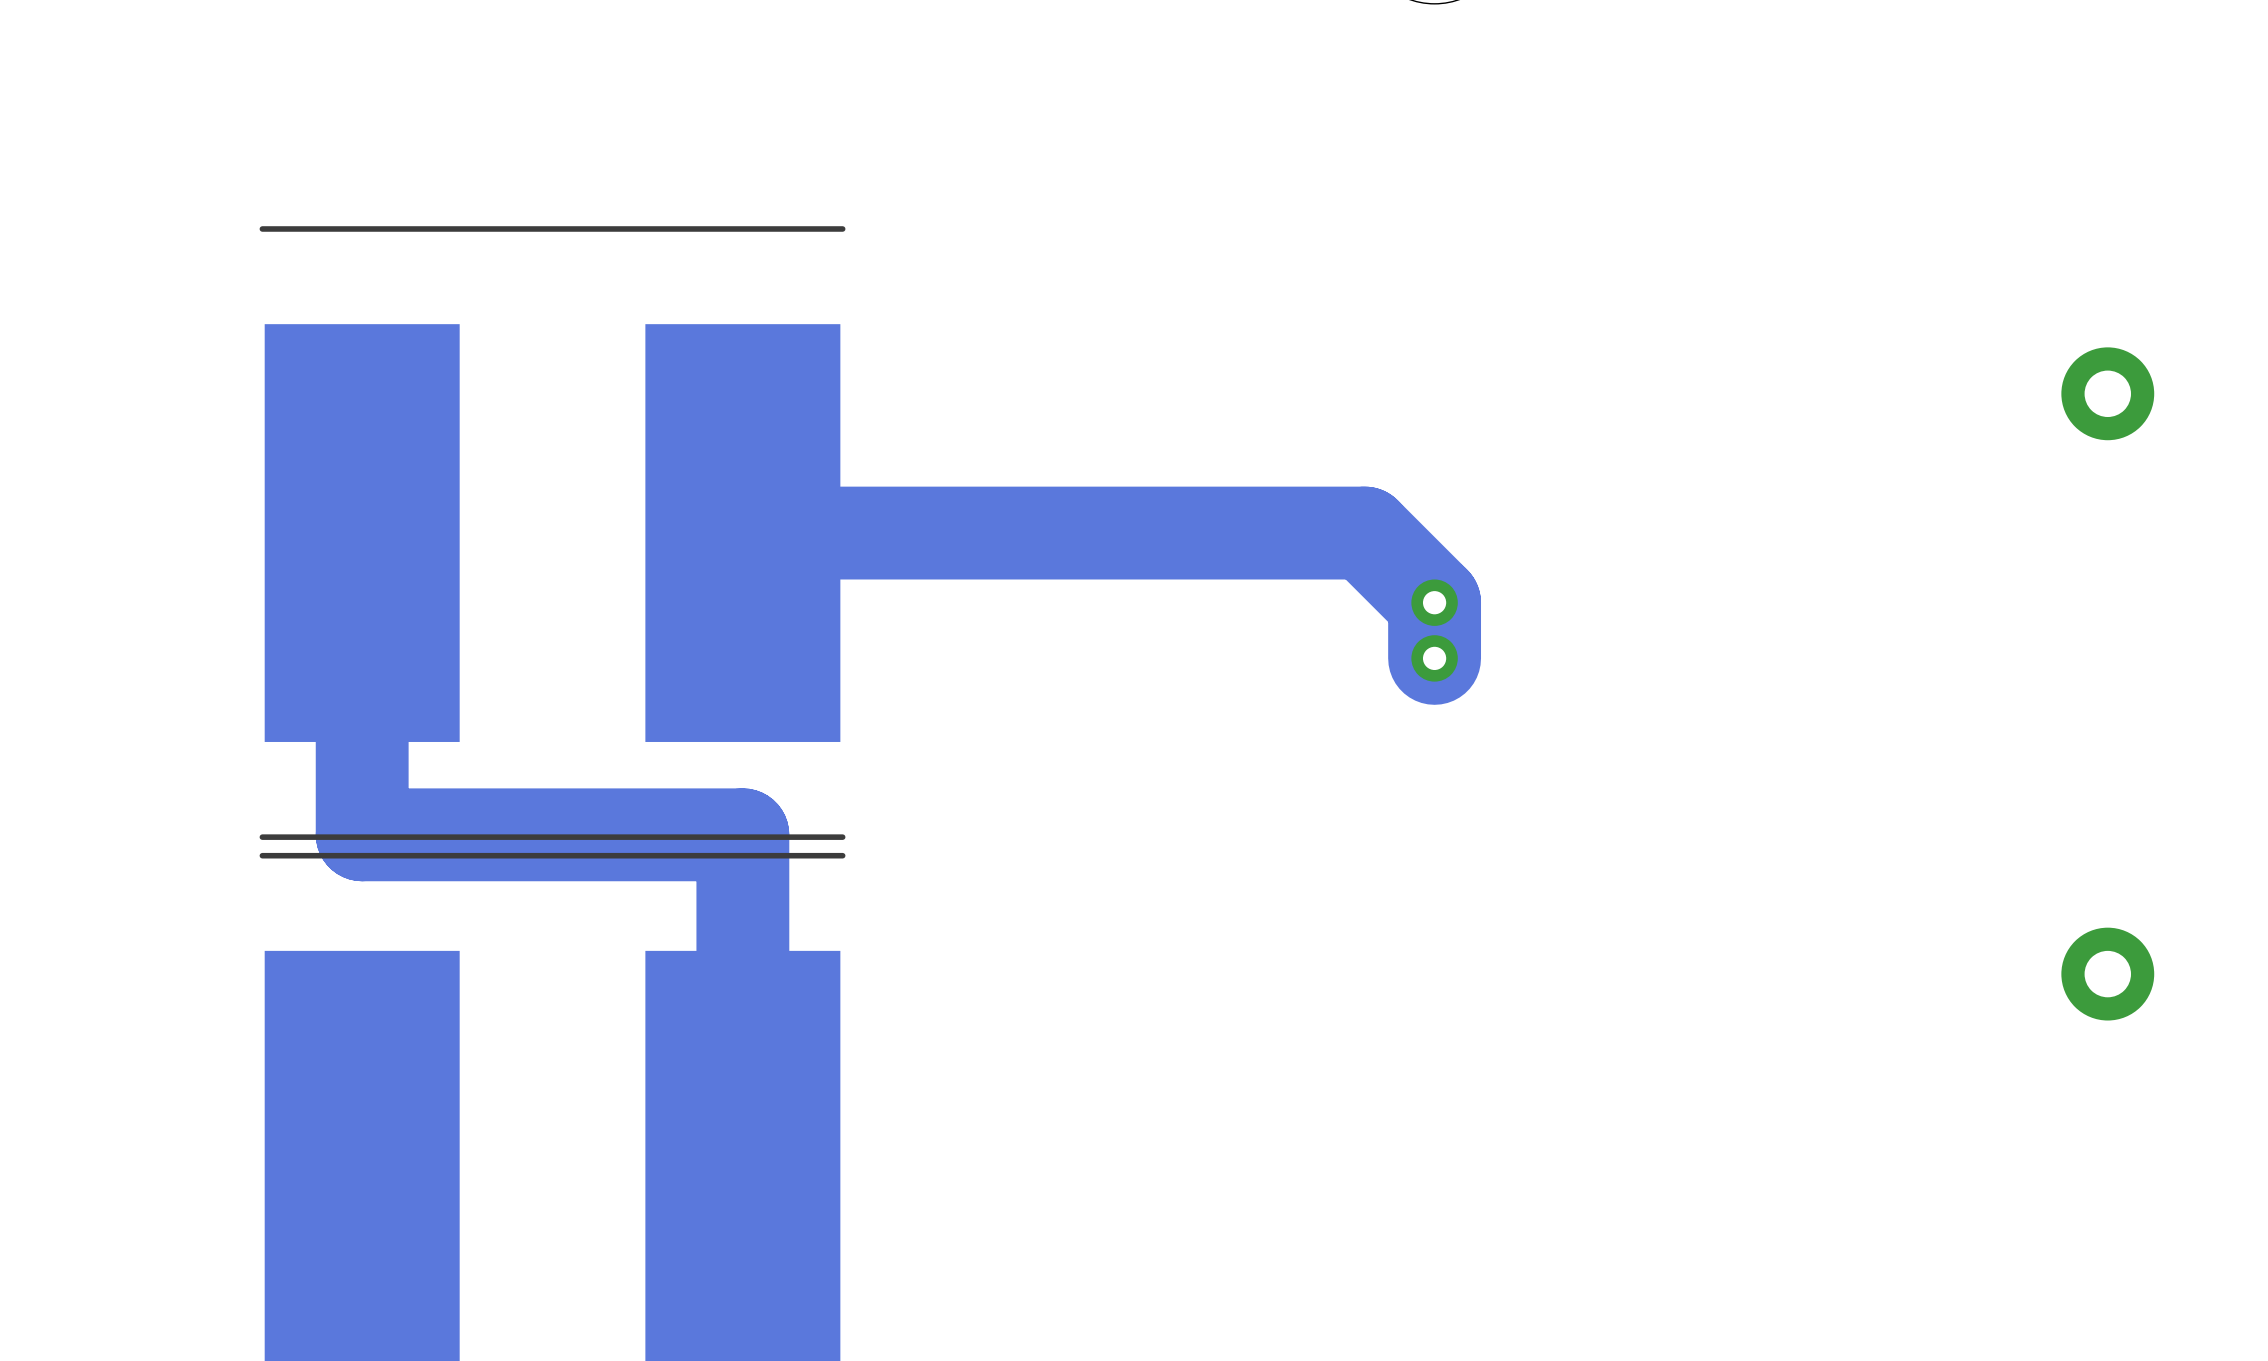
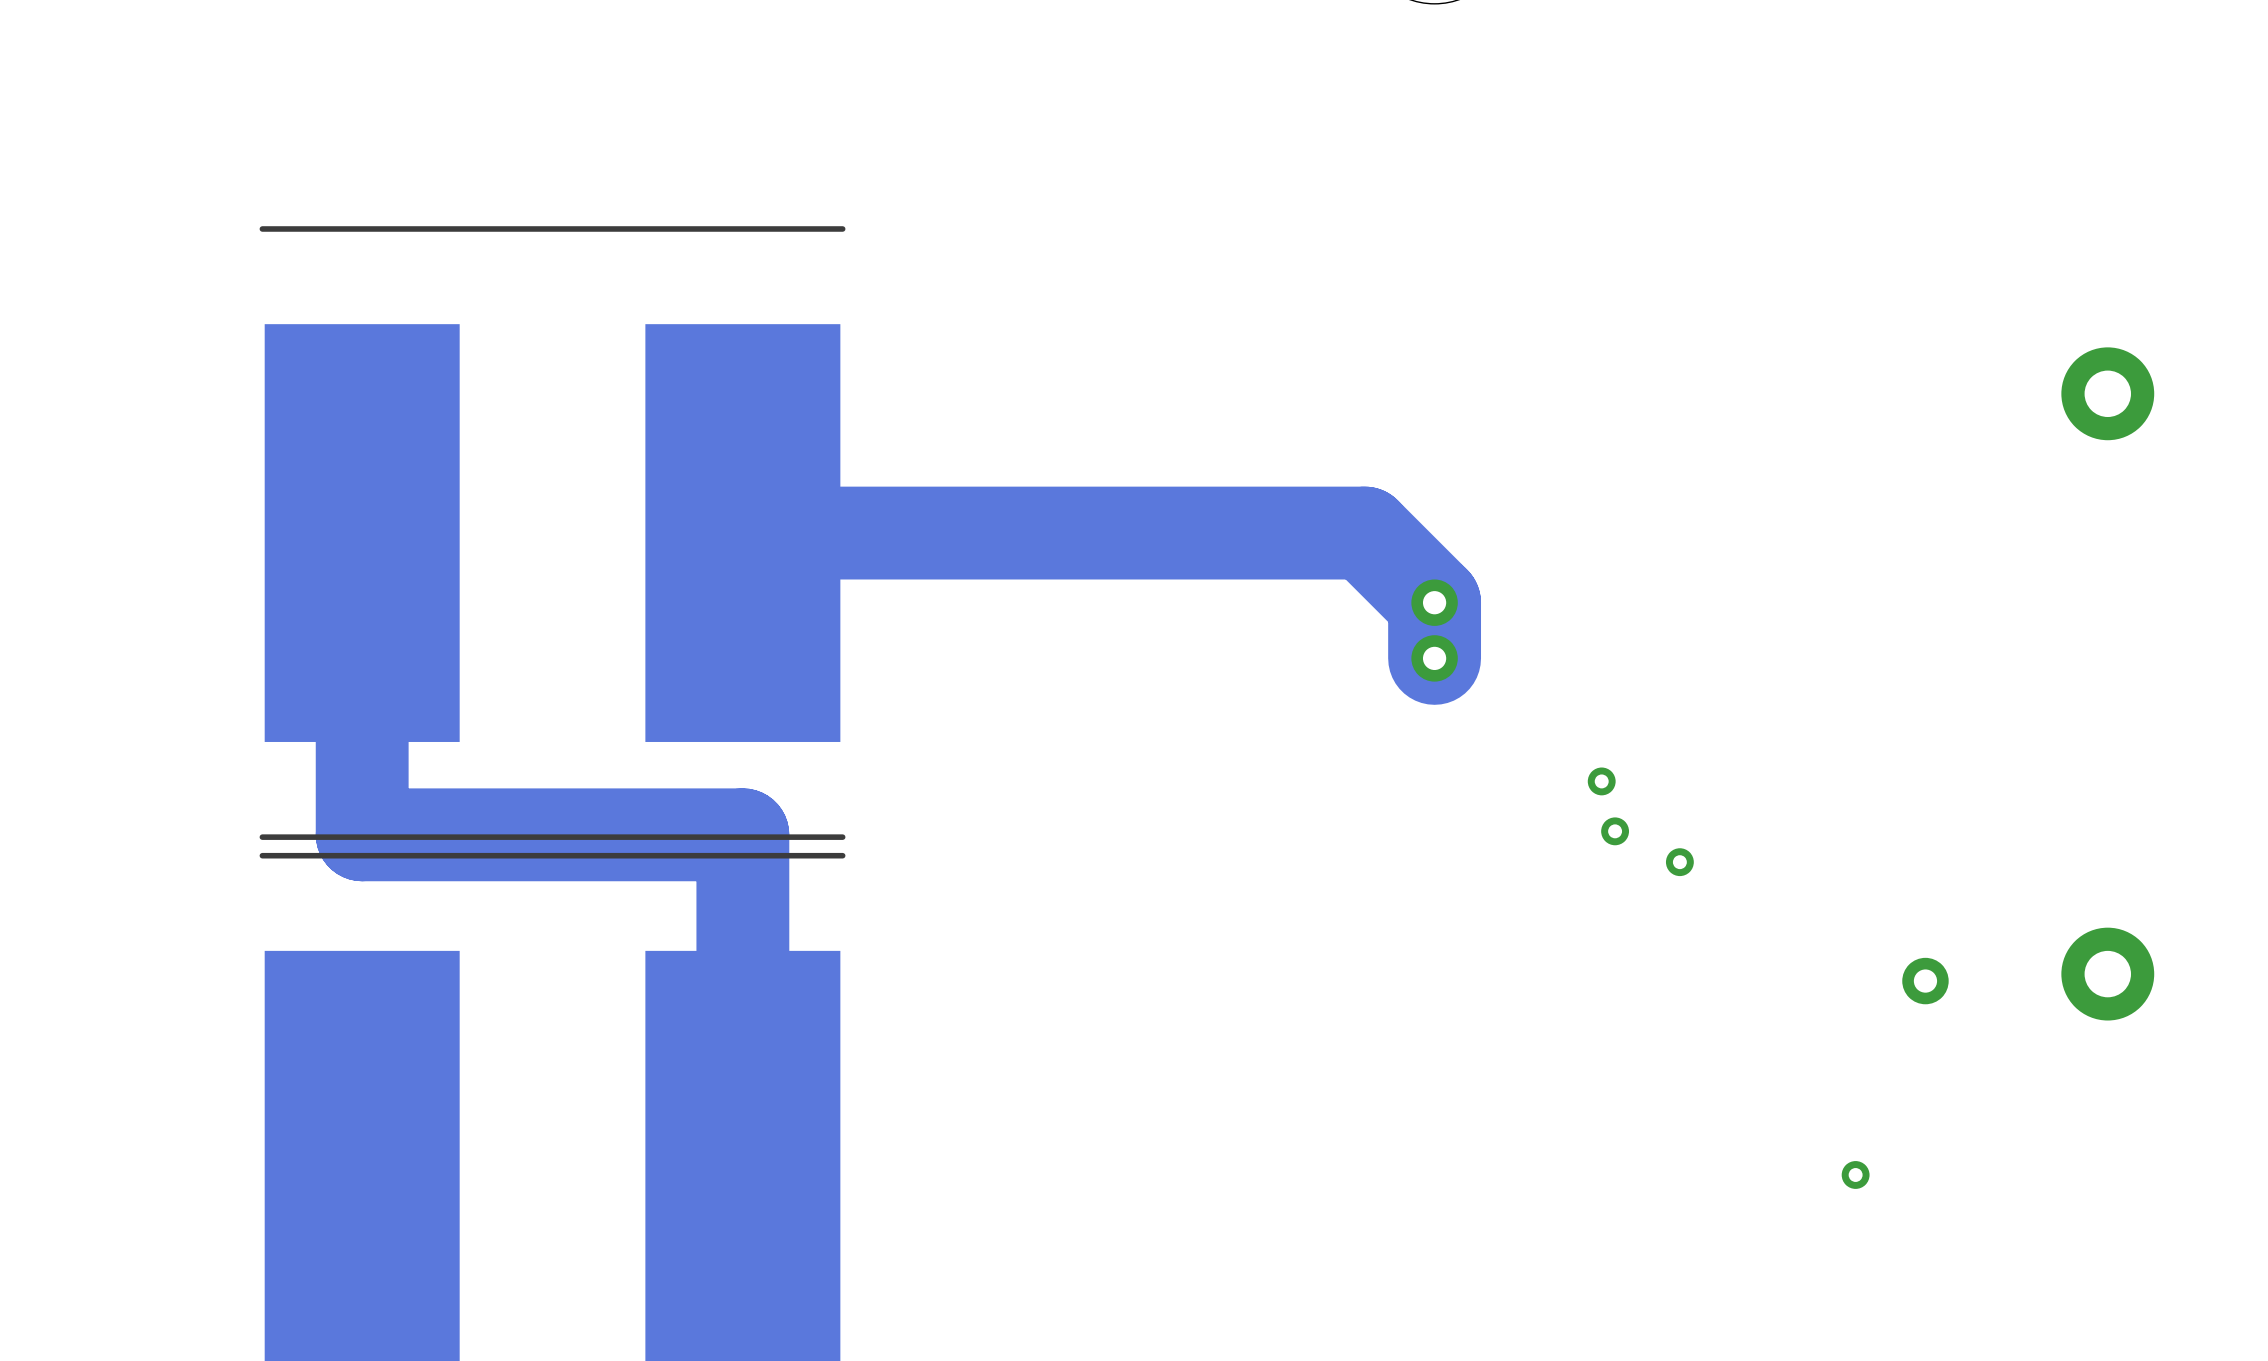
via: none -> (1601, 781)
via: none -> (1615, 831)
via: none -> (1679, 862)
via: none -> (1925, 981)
via: none -> (1855, 1174)

